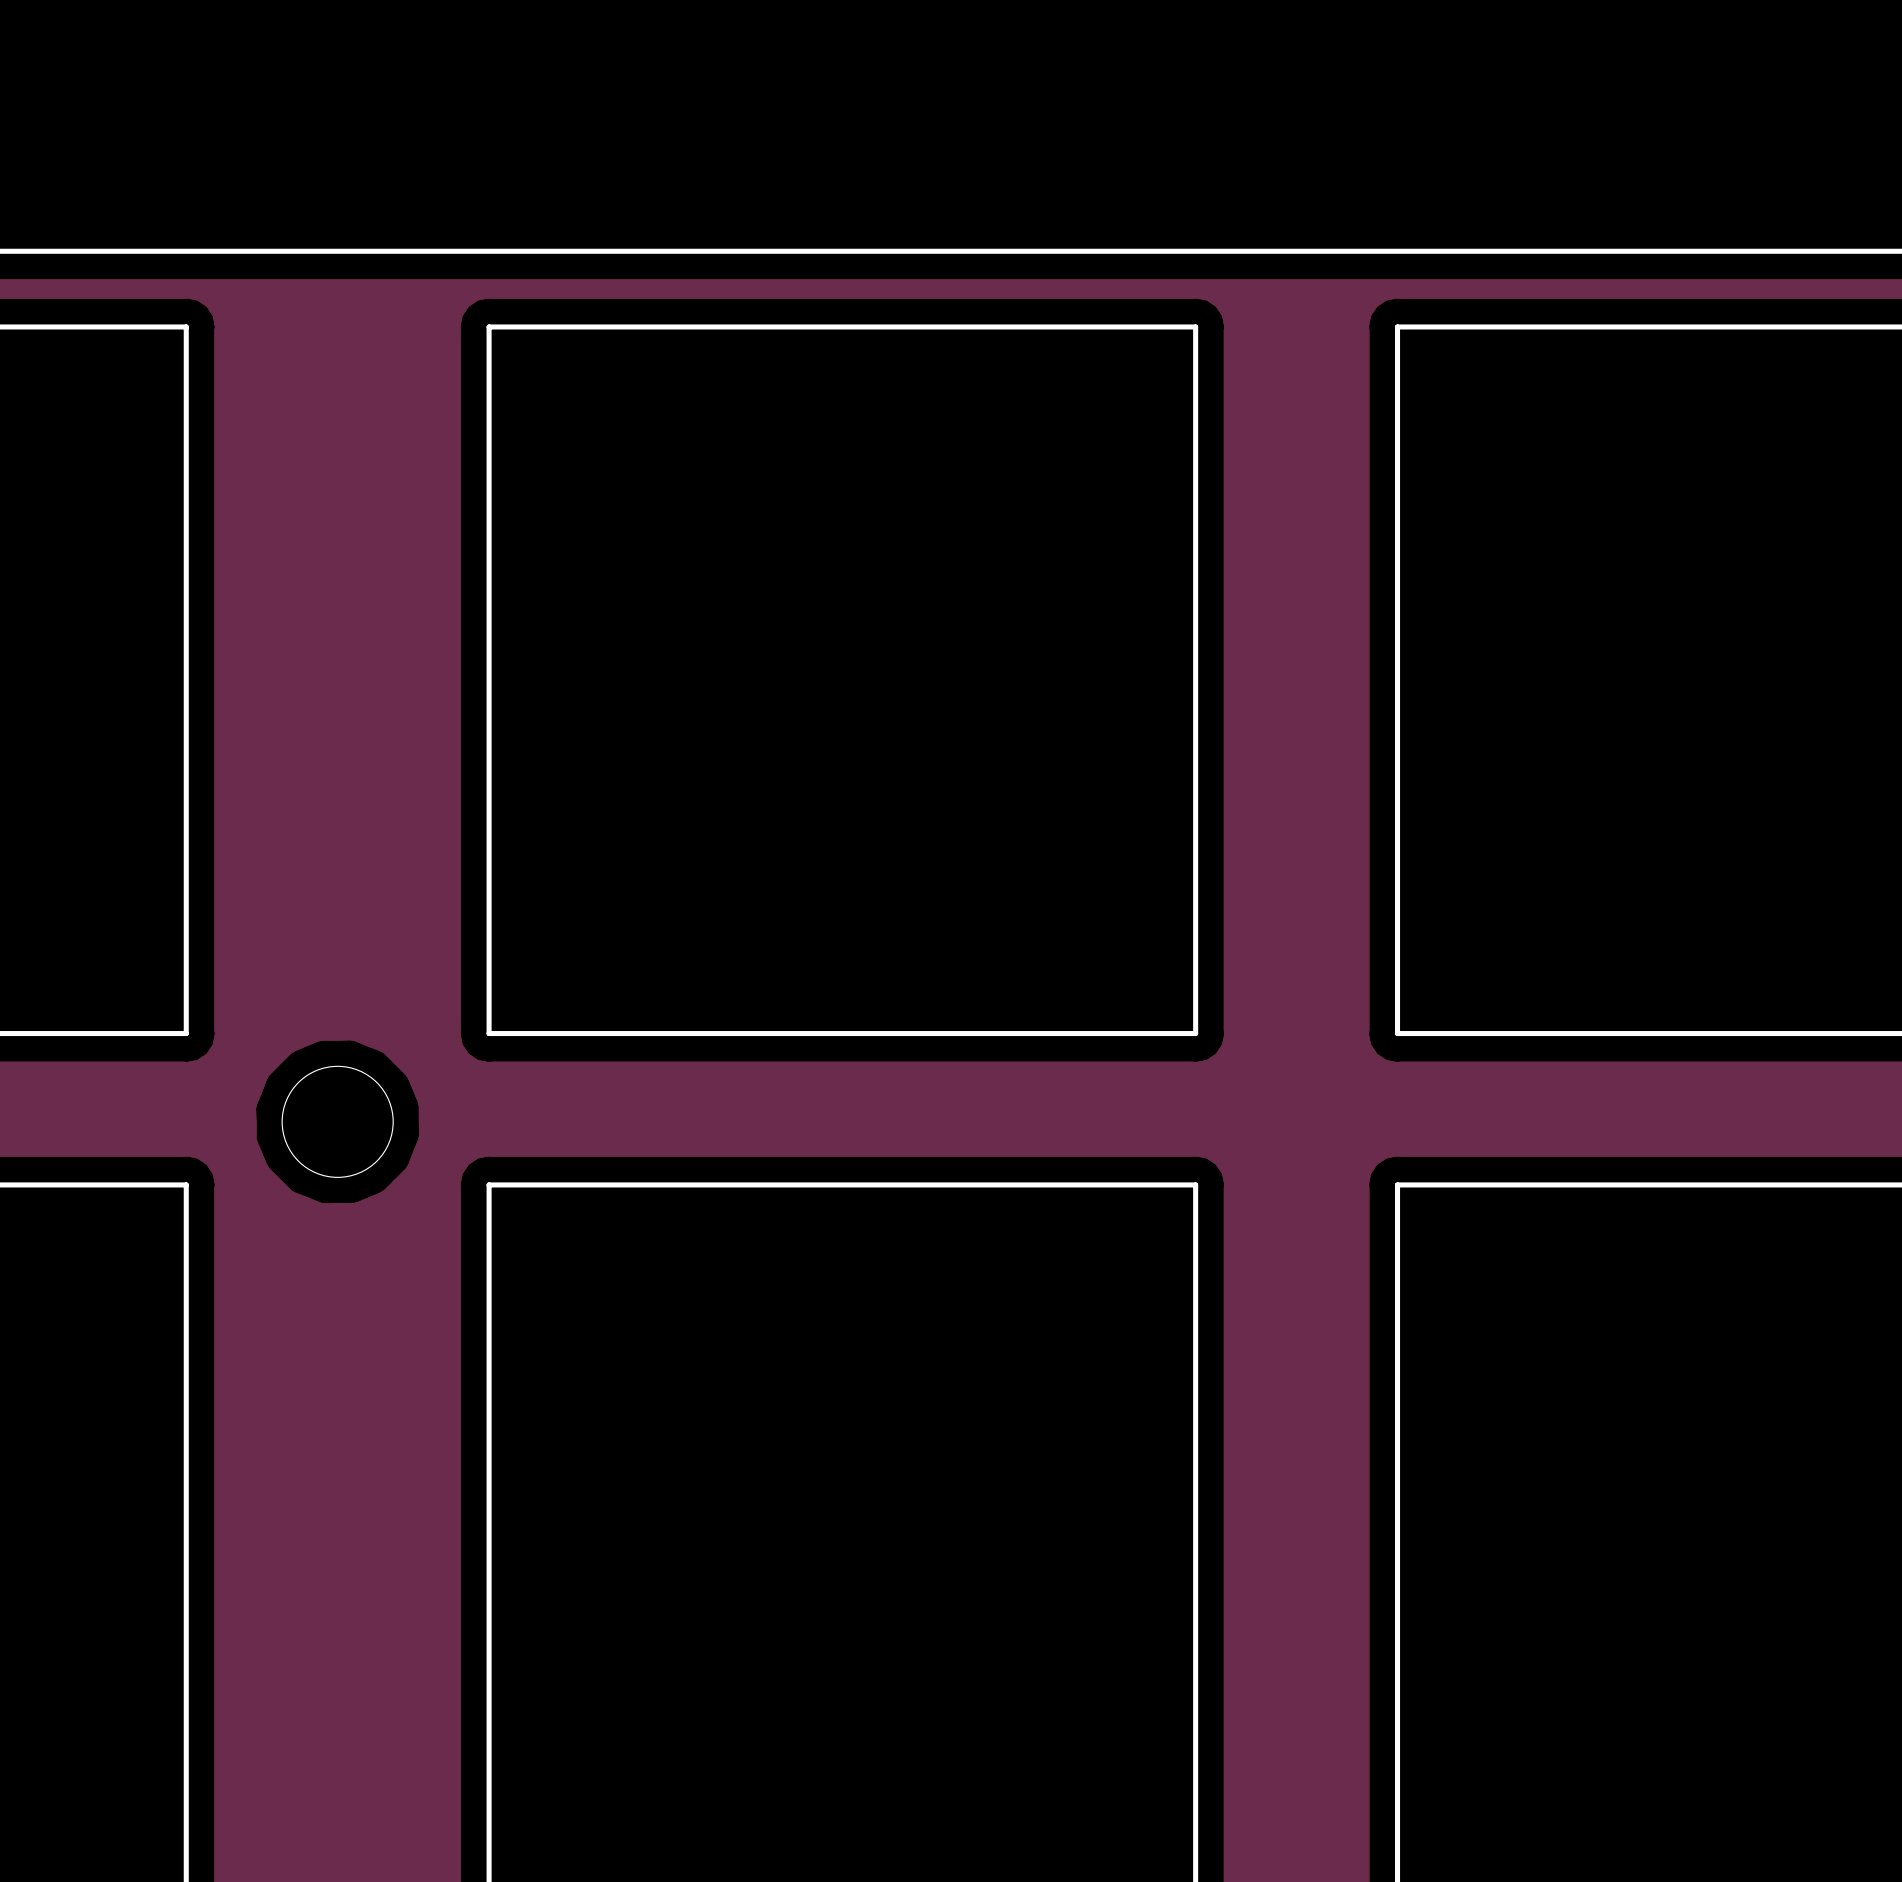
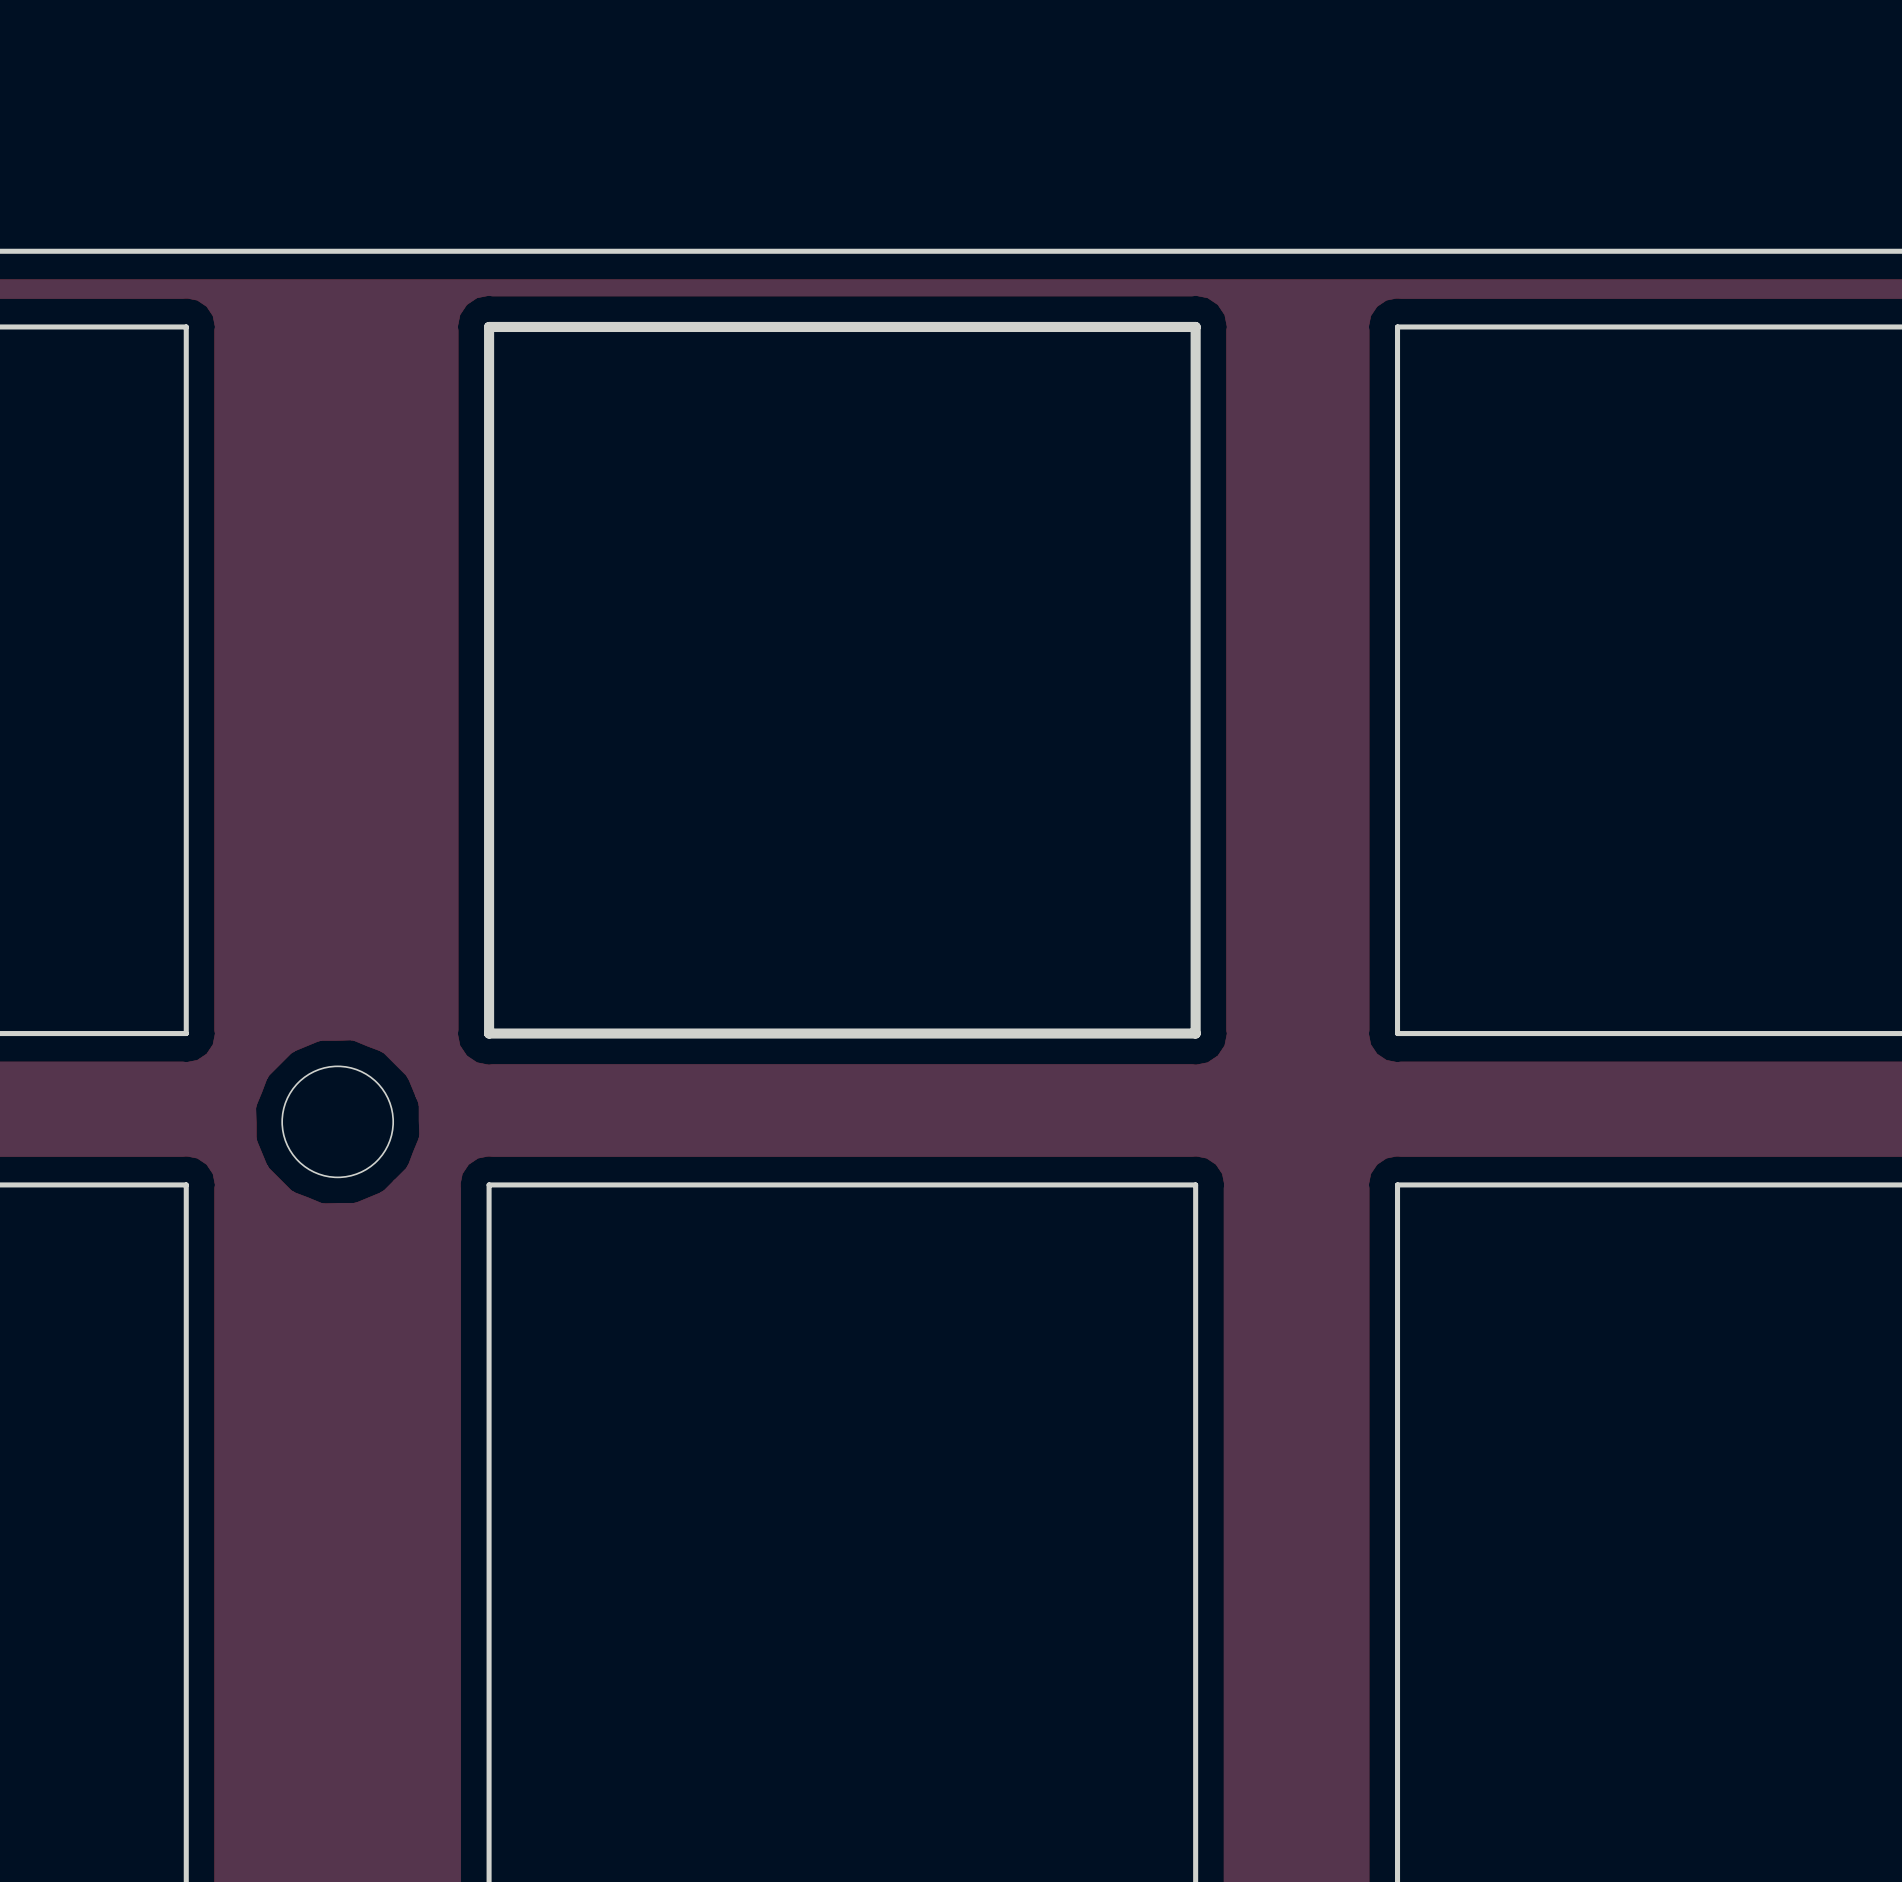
board edge width: thin (489, 326) (1195, 326) (1195, 1033) (489, 1033) (489, 326) -> thick (489, 326) (1195, 326) (1195, 1033) (489, 1033) (489, 326)

